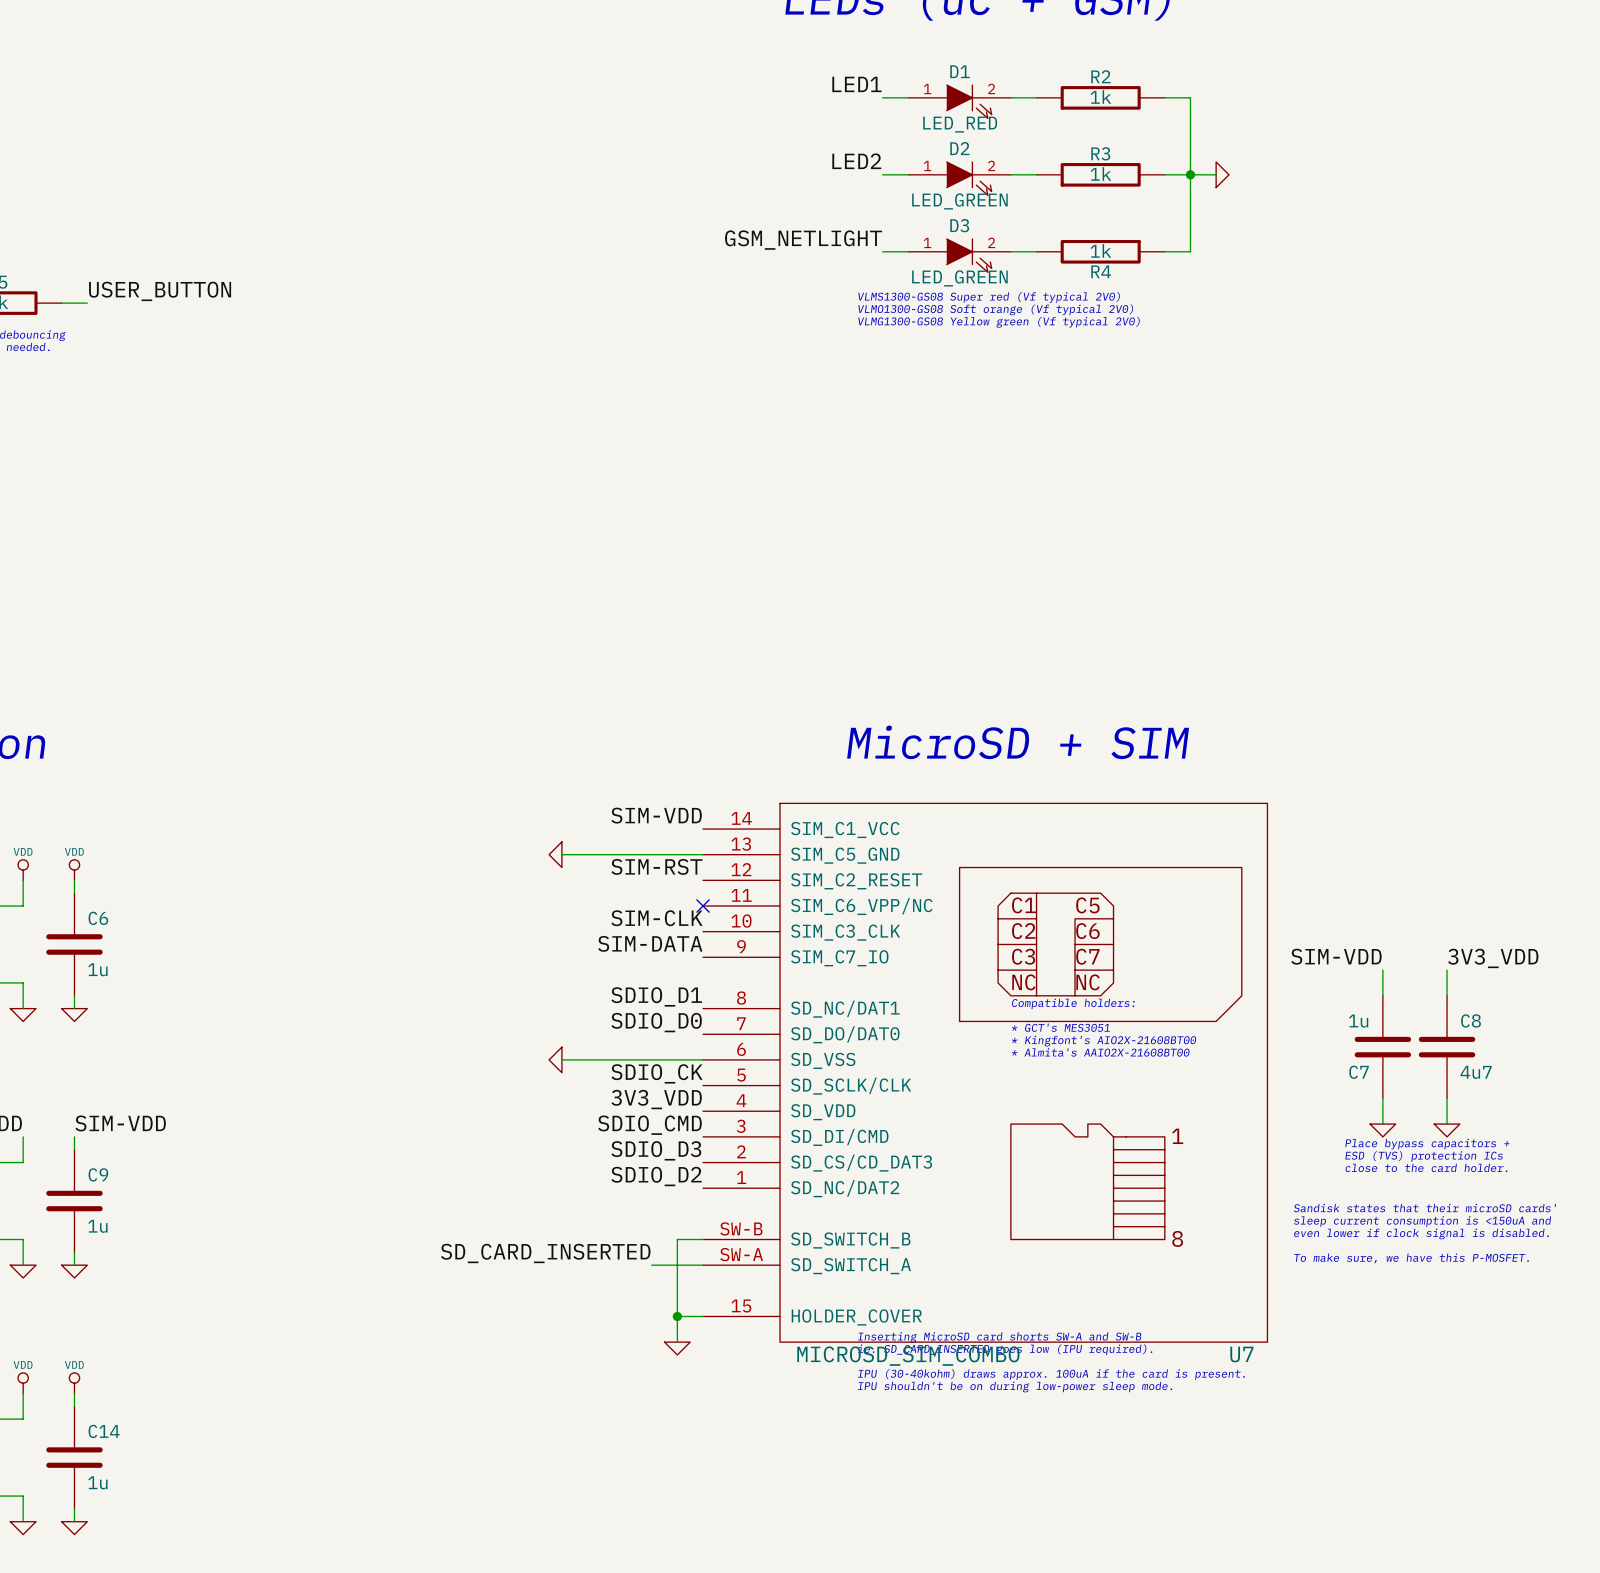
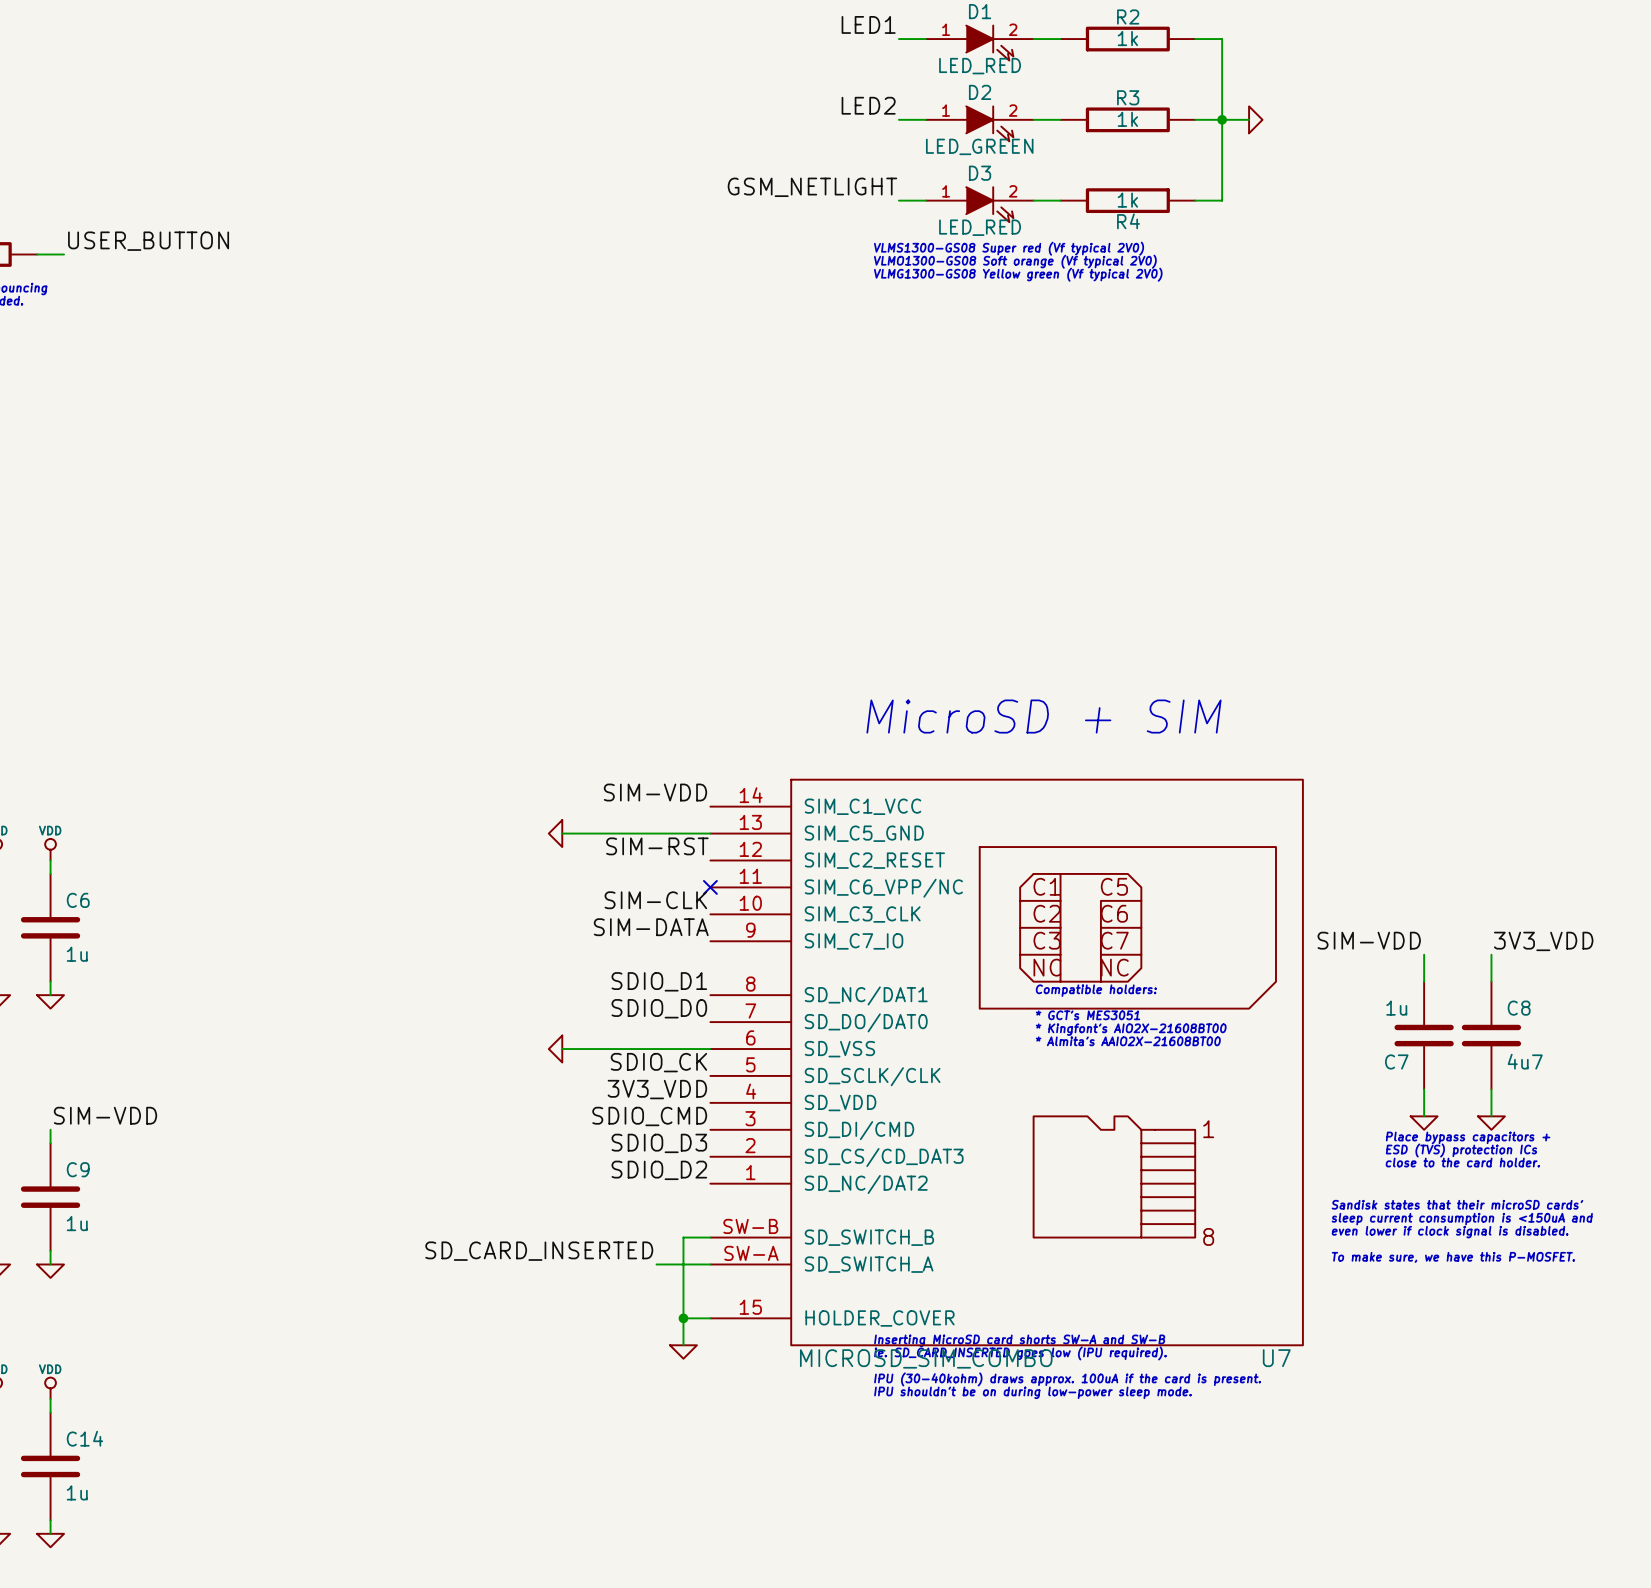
D3 value: LED_GREEN (959, 278) -> LED_RED (980, 227)

